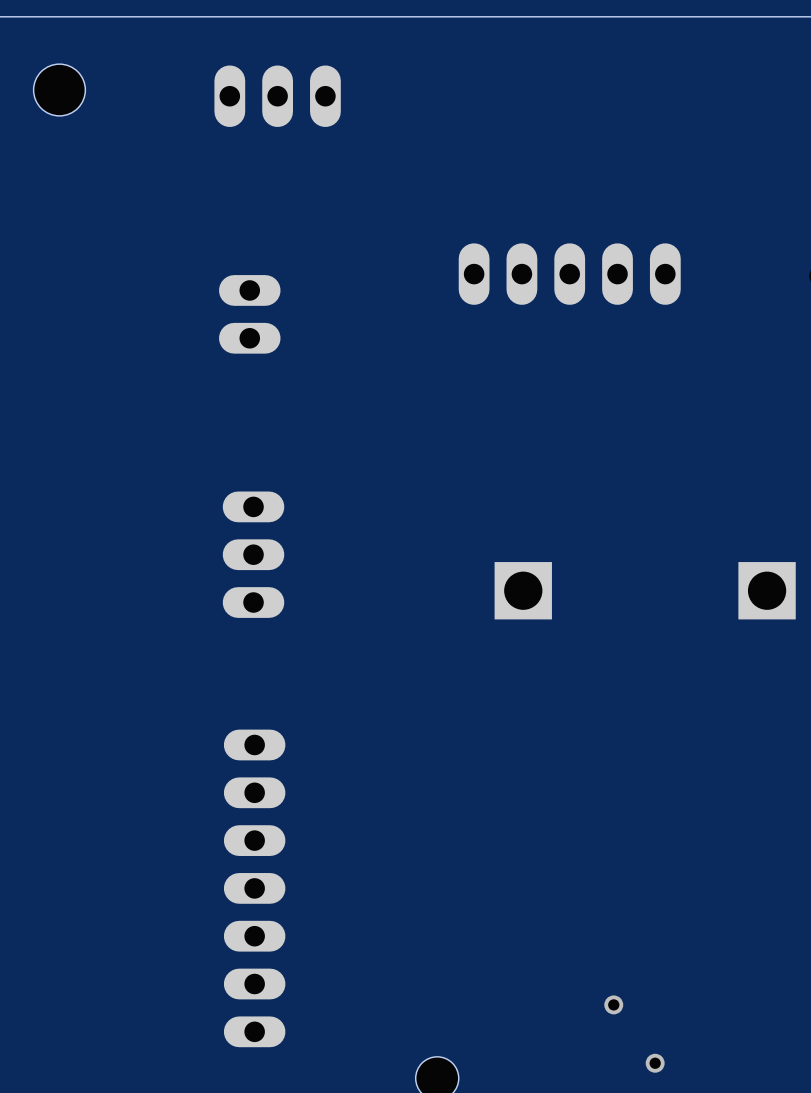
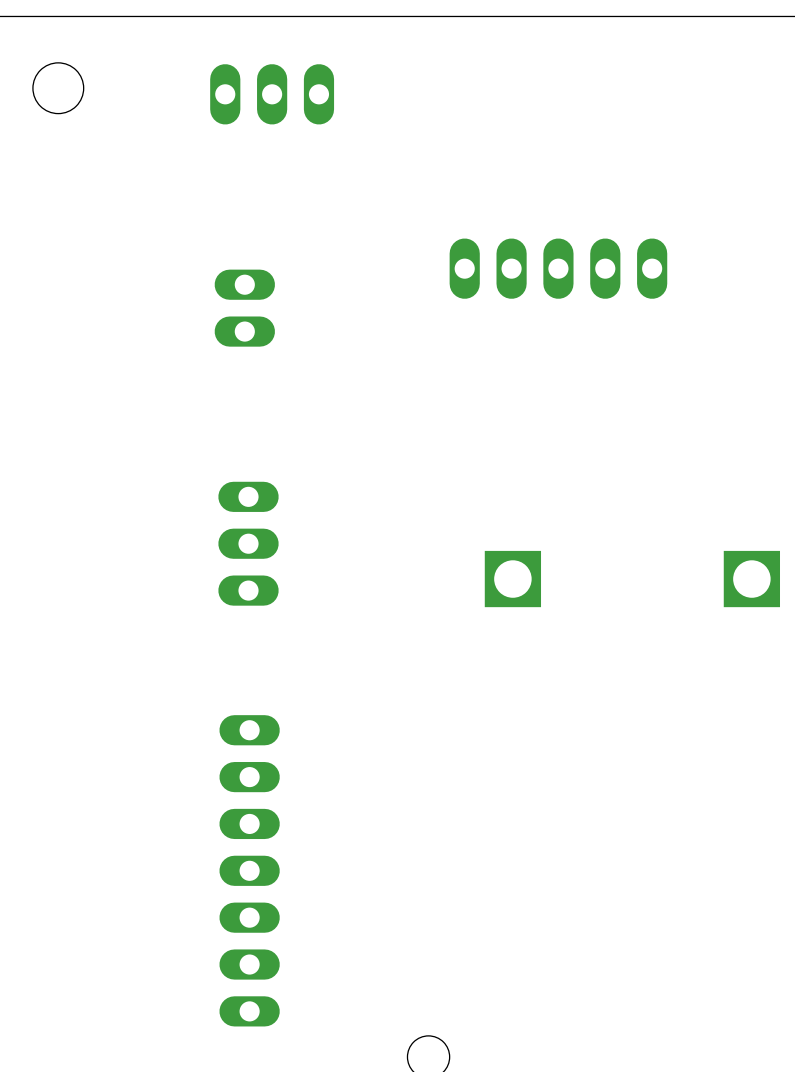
via: (613, 1004) -> none
via: (655, 1063) -> none

